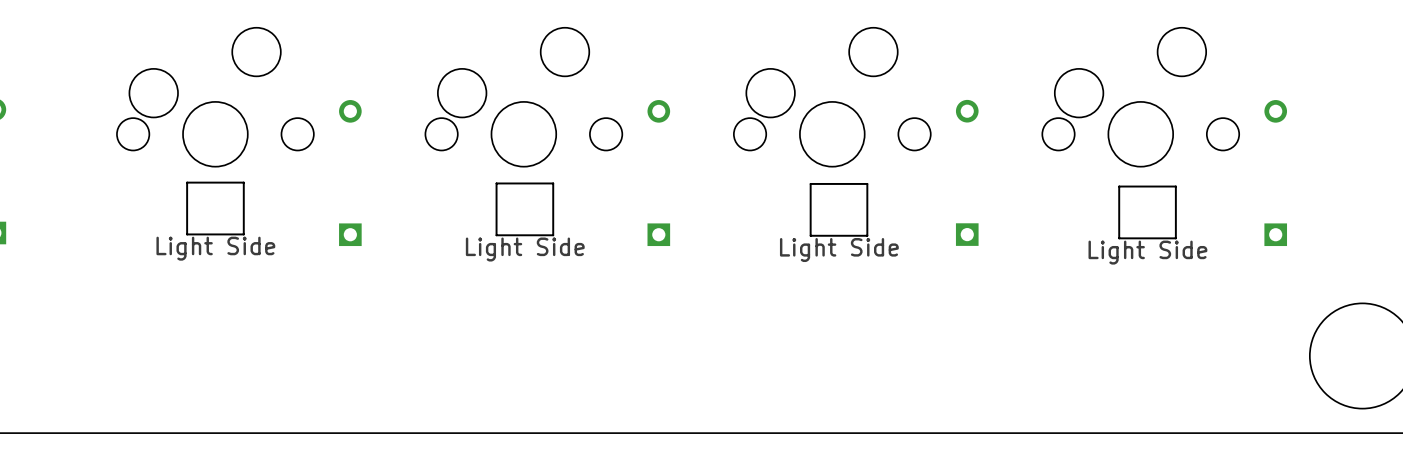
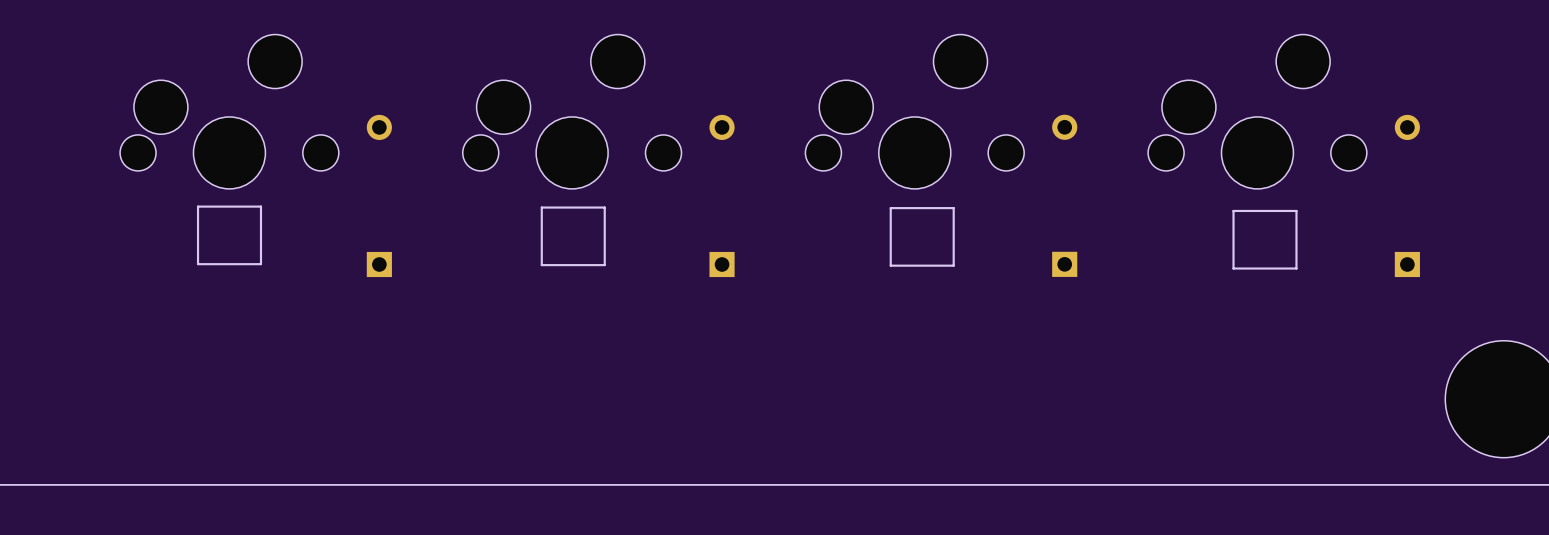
part text: Light Side (215, 248) -> none
part text: Light Side (525, 249) -> none
part text: Light Side (839, 250) -> none
part text: Light Side (1147, 252) -> none

